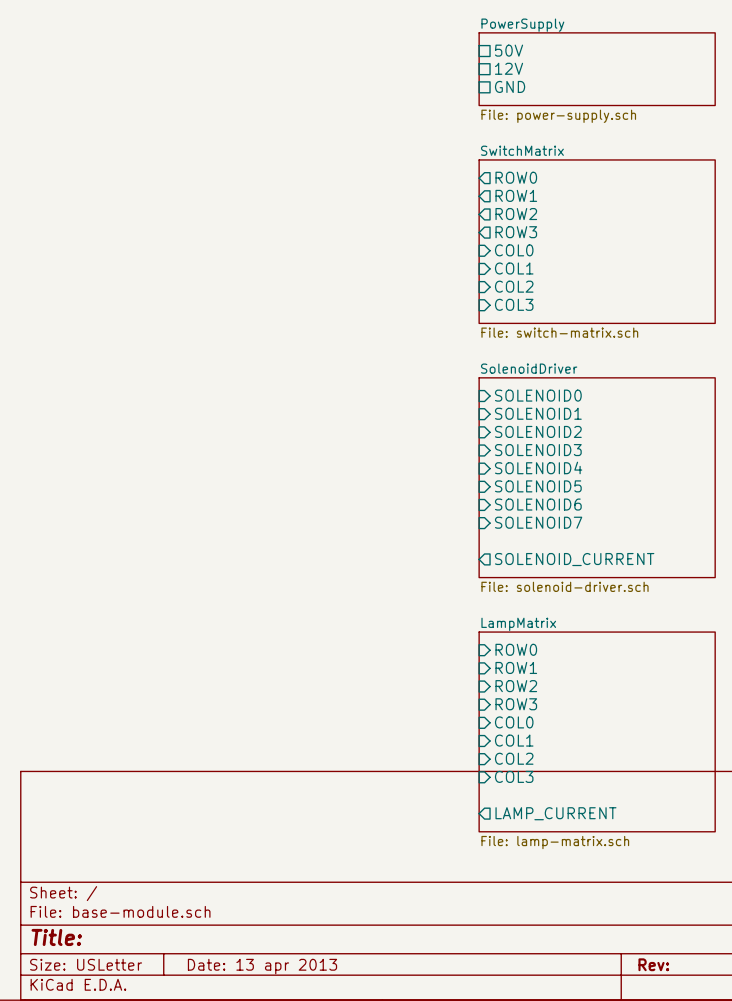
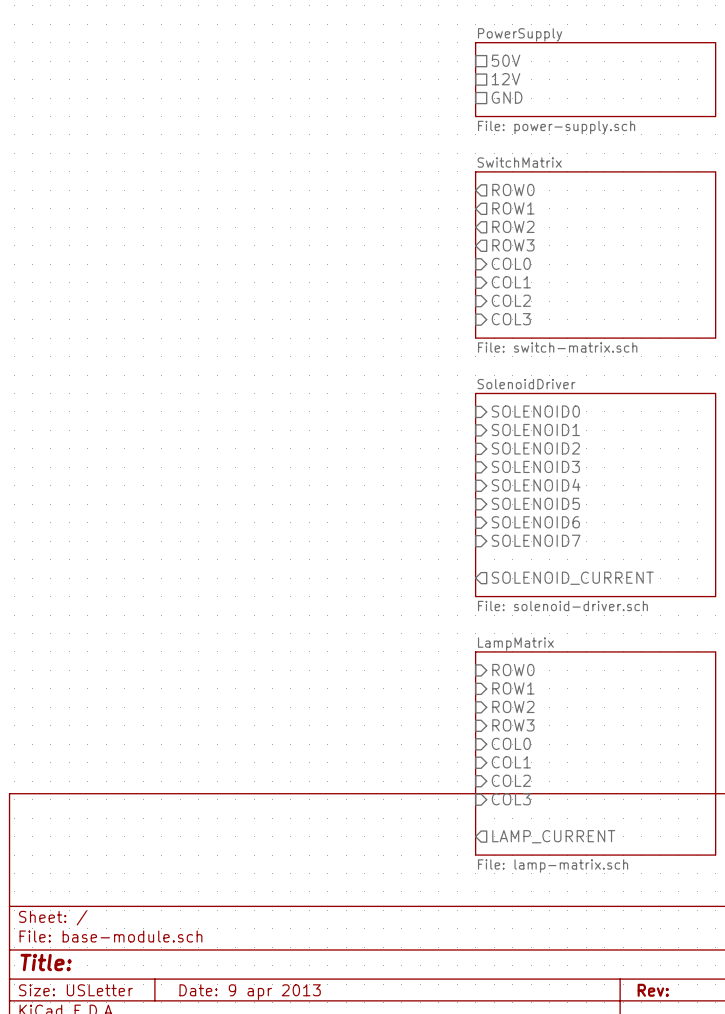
title block: Date: 13 apr 2013 (262, 966) -> Date: 9 apr 2013 (250, 992)

